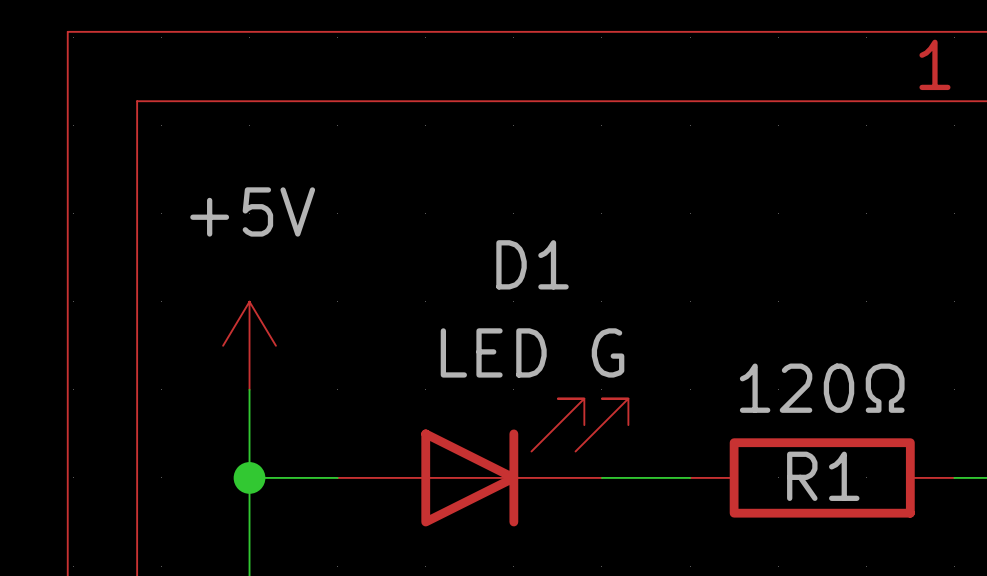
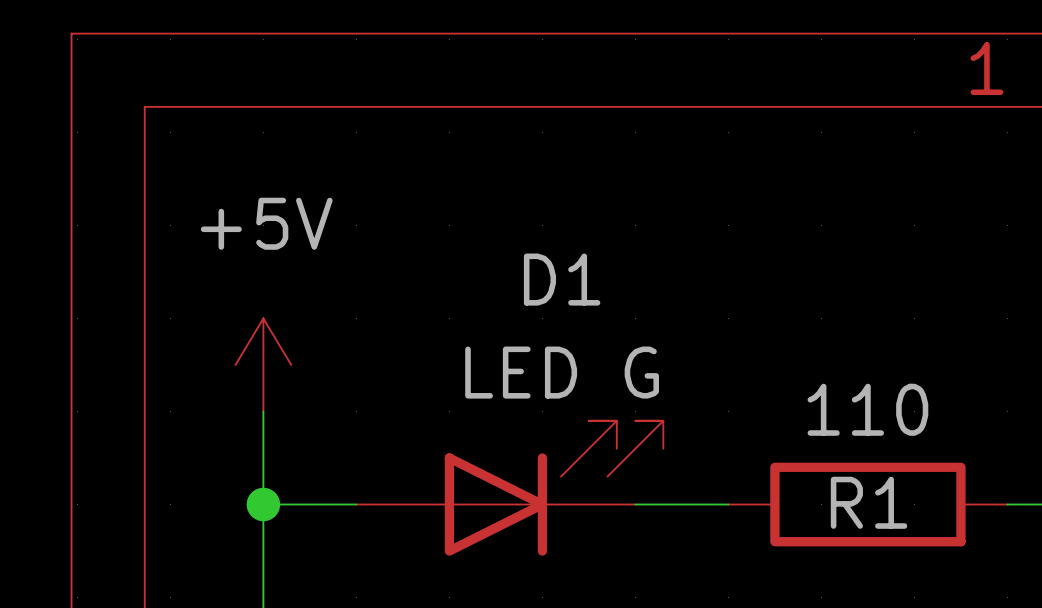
R1 value: 120Ω (822, 388) -> 110 (867, 409)

